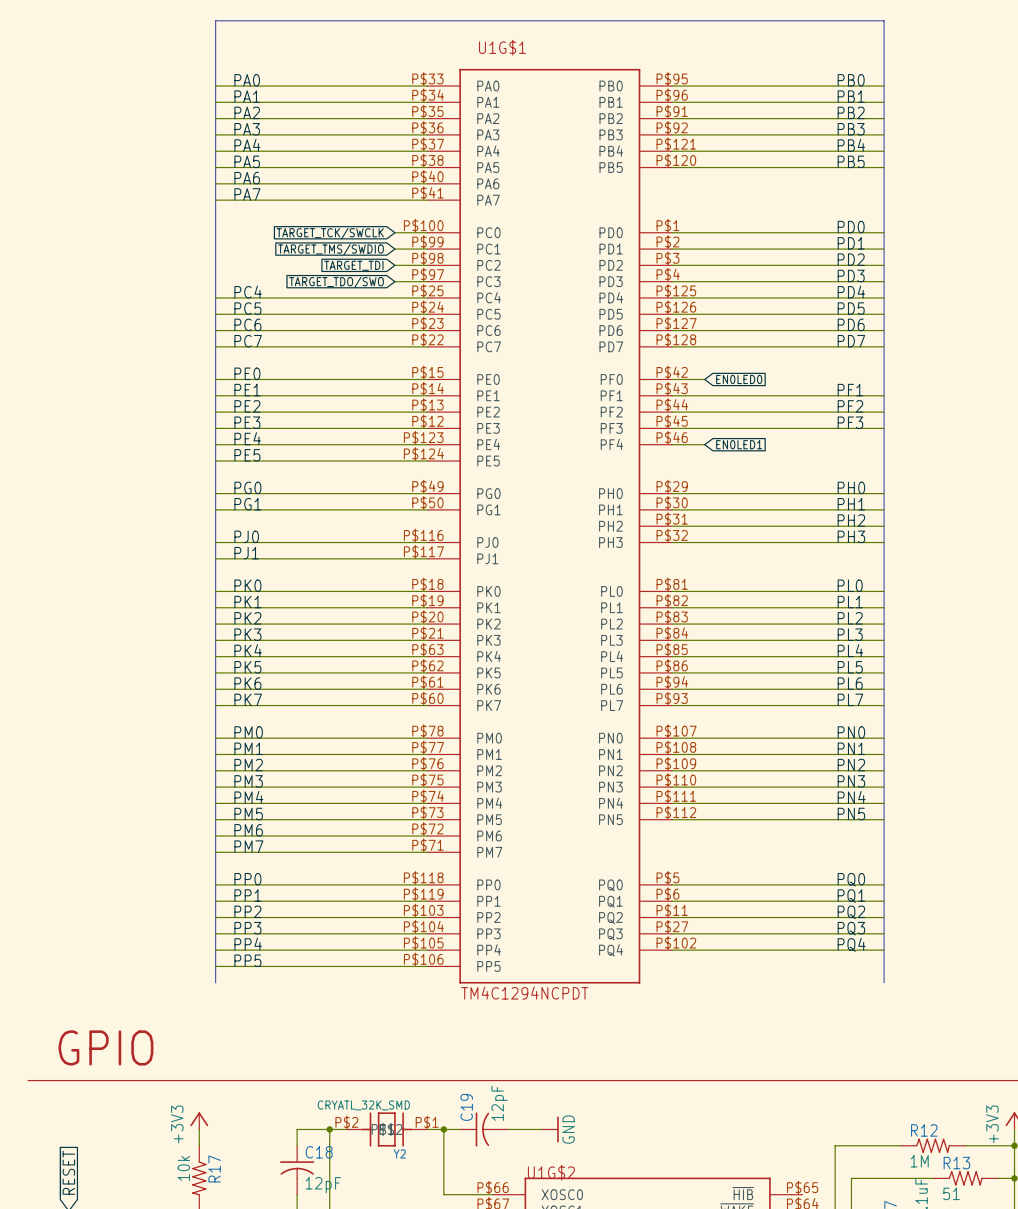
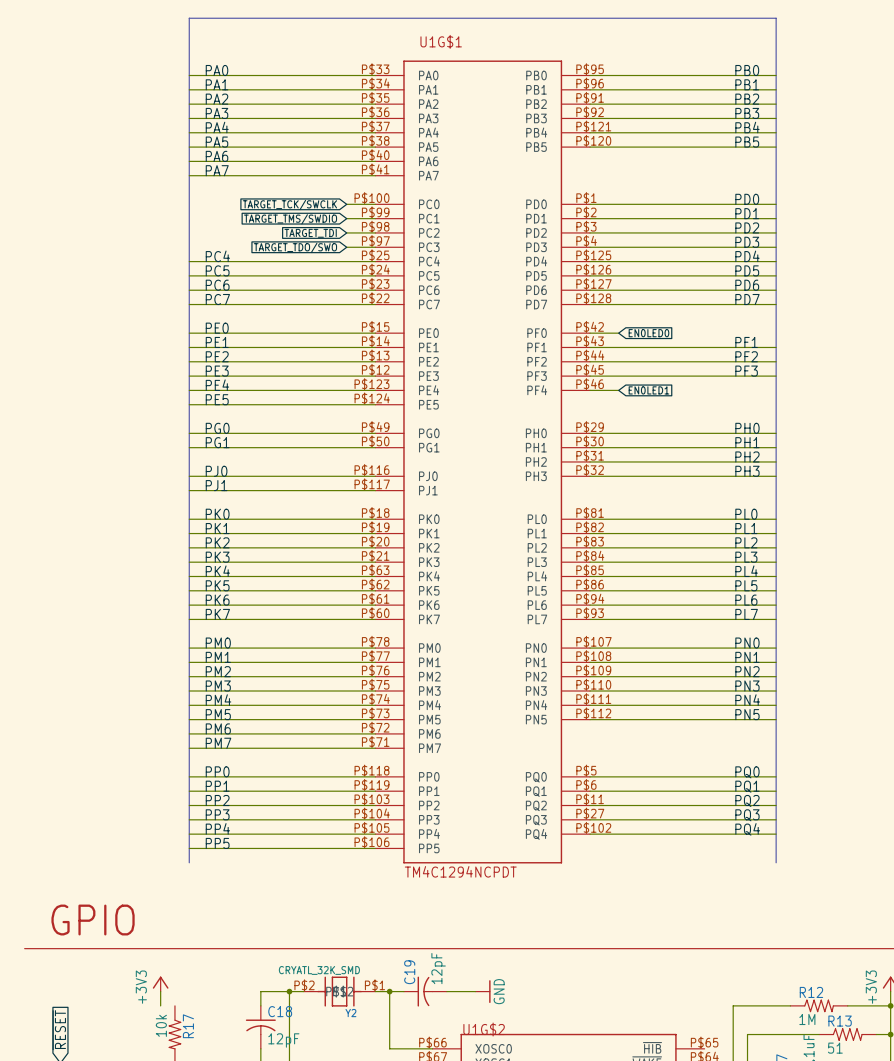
power symbol position: +3V3 (199, 1120) -> +3V3 (160, 984)
wire: (199, 1129) (199, 1145) -> (160, 991) (160, 1005)

